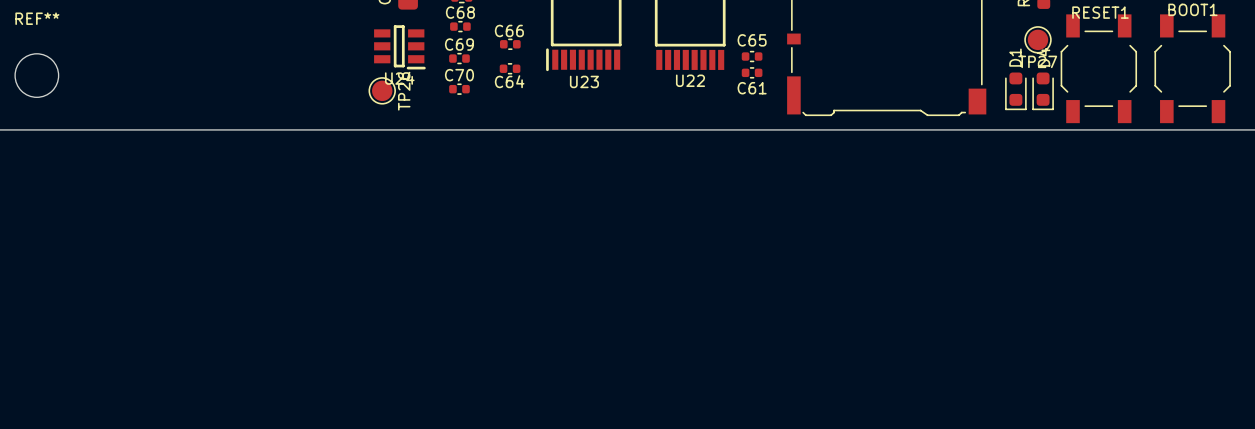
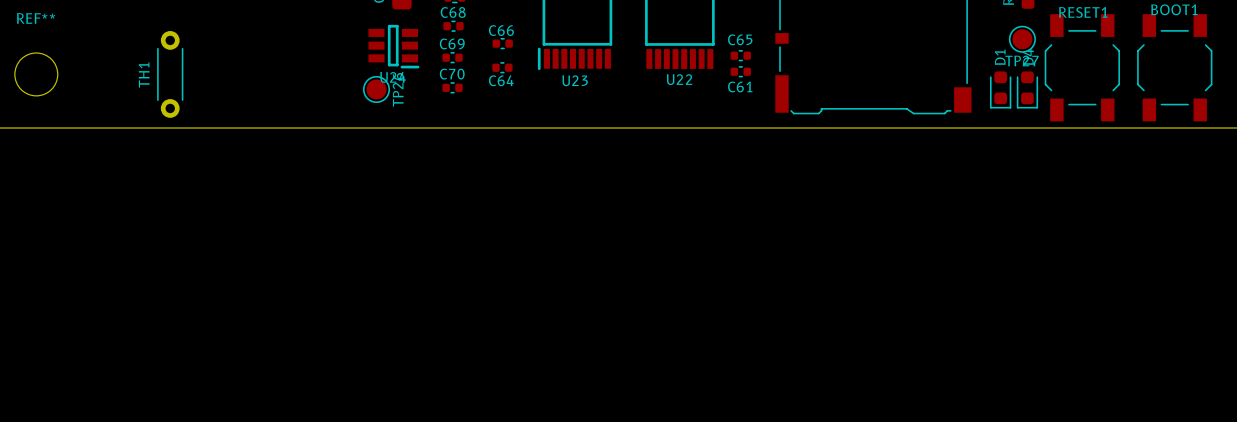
TH1: none -> (170, 74)

